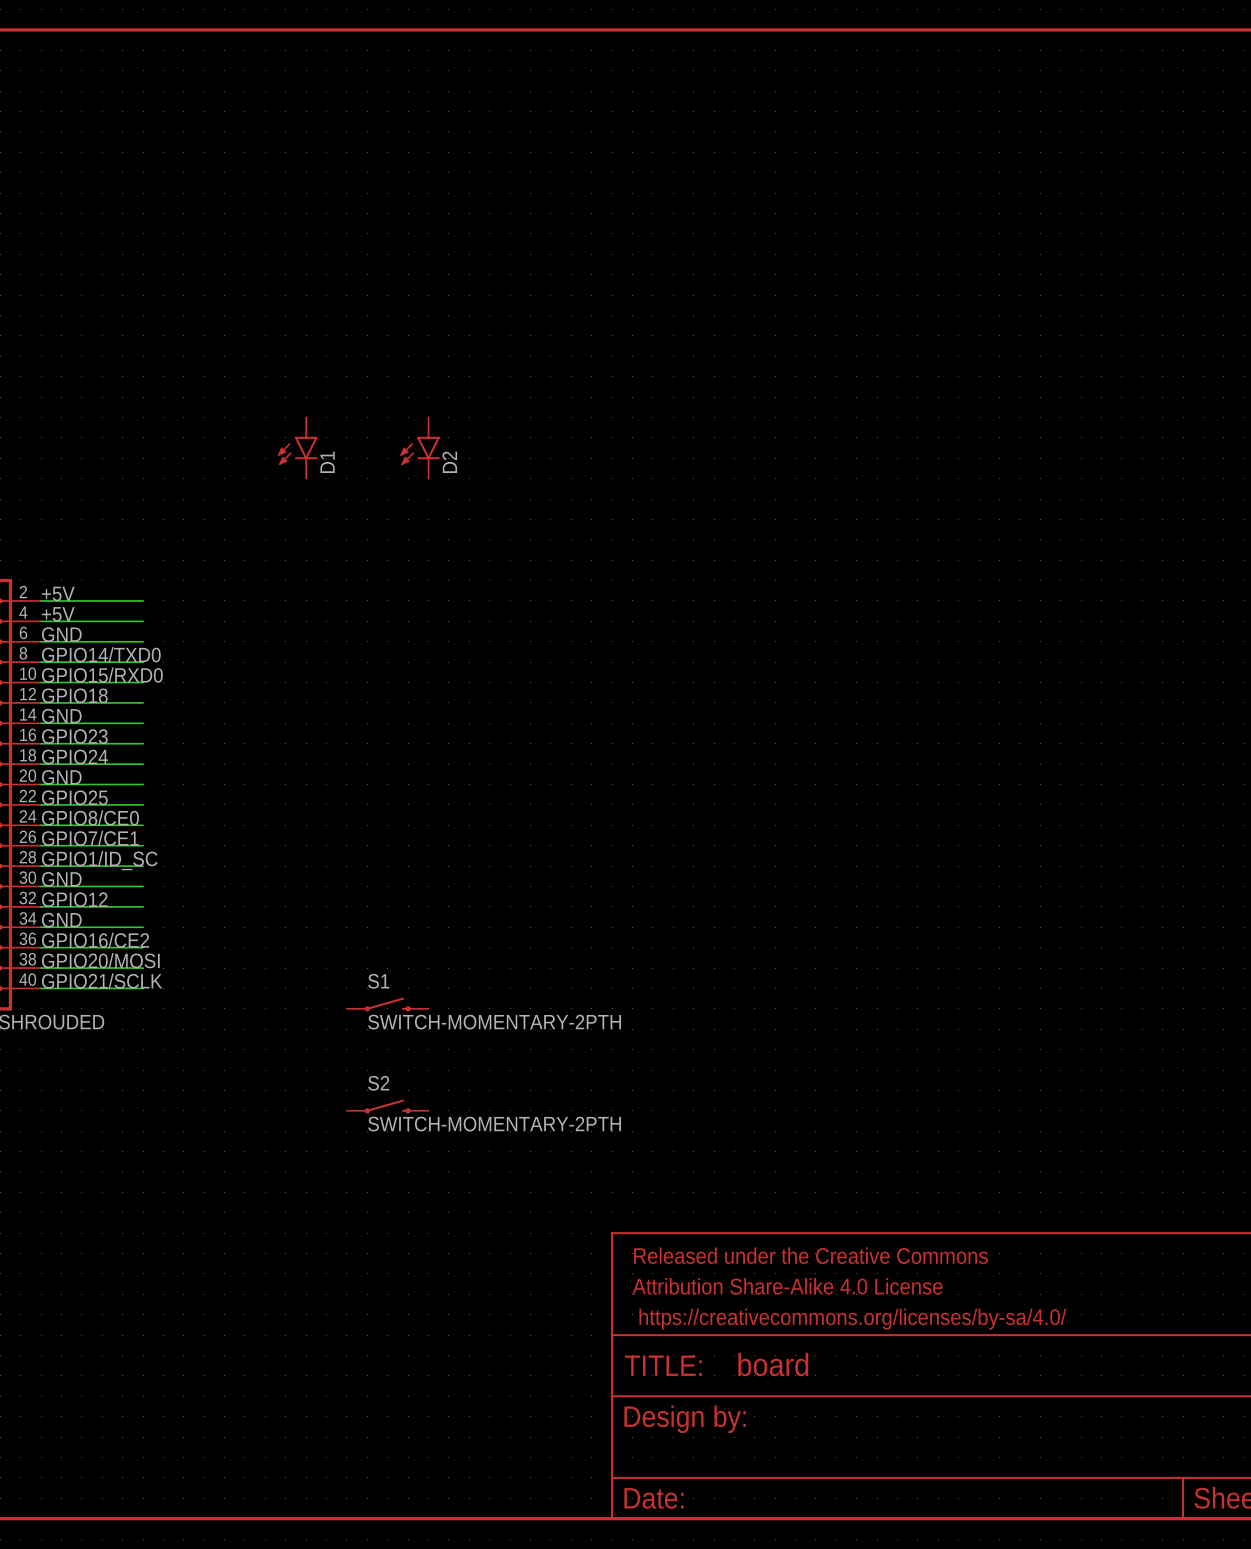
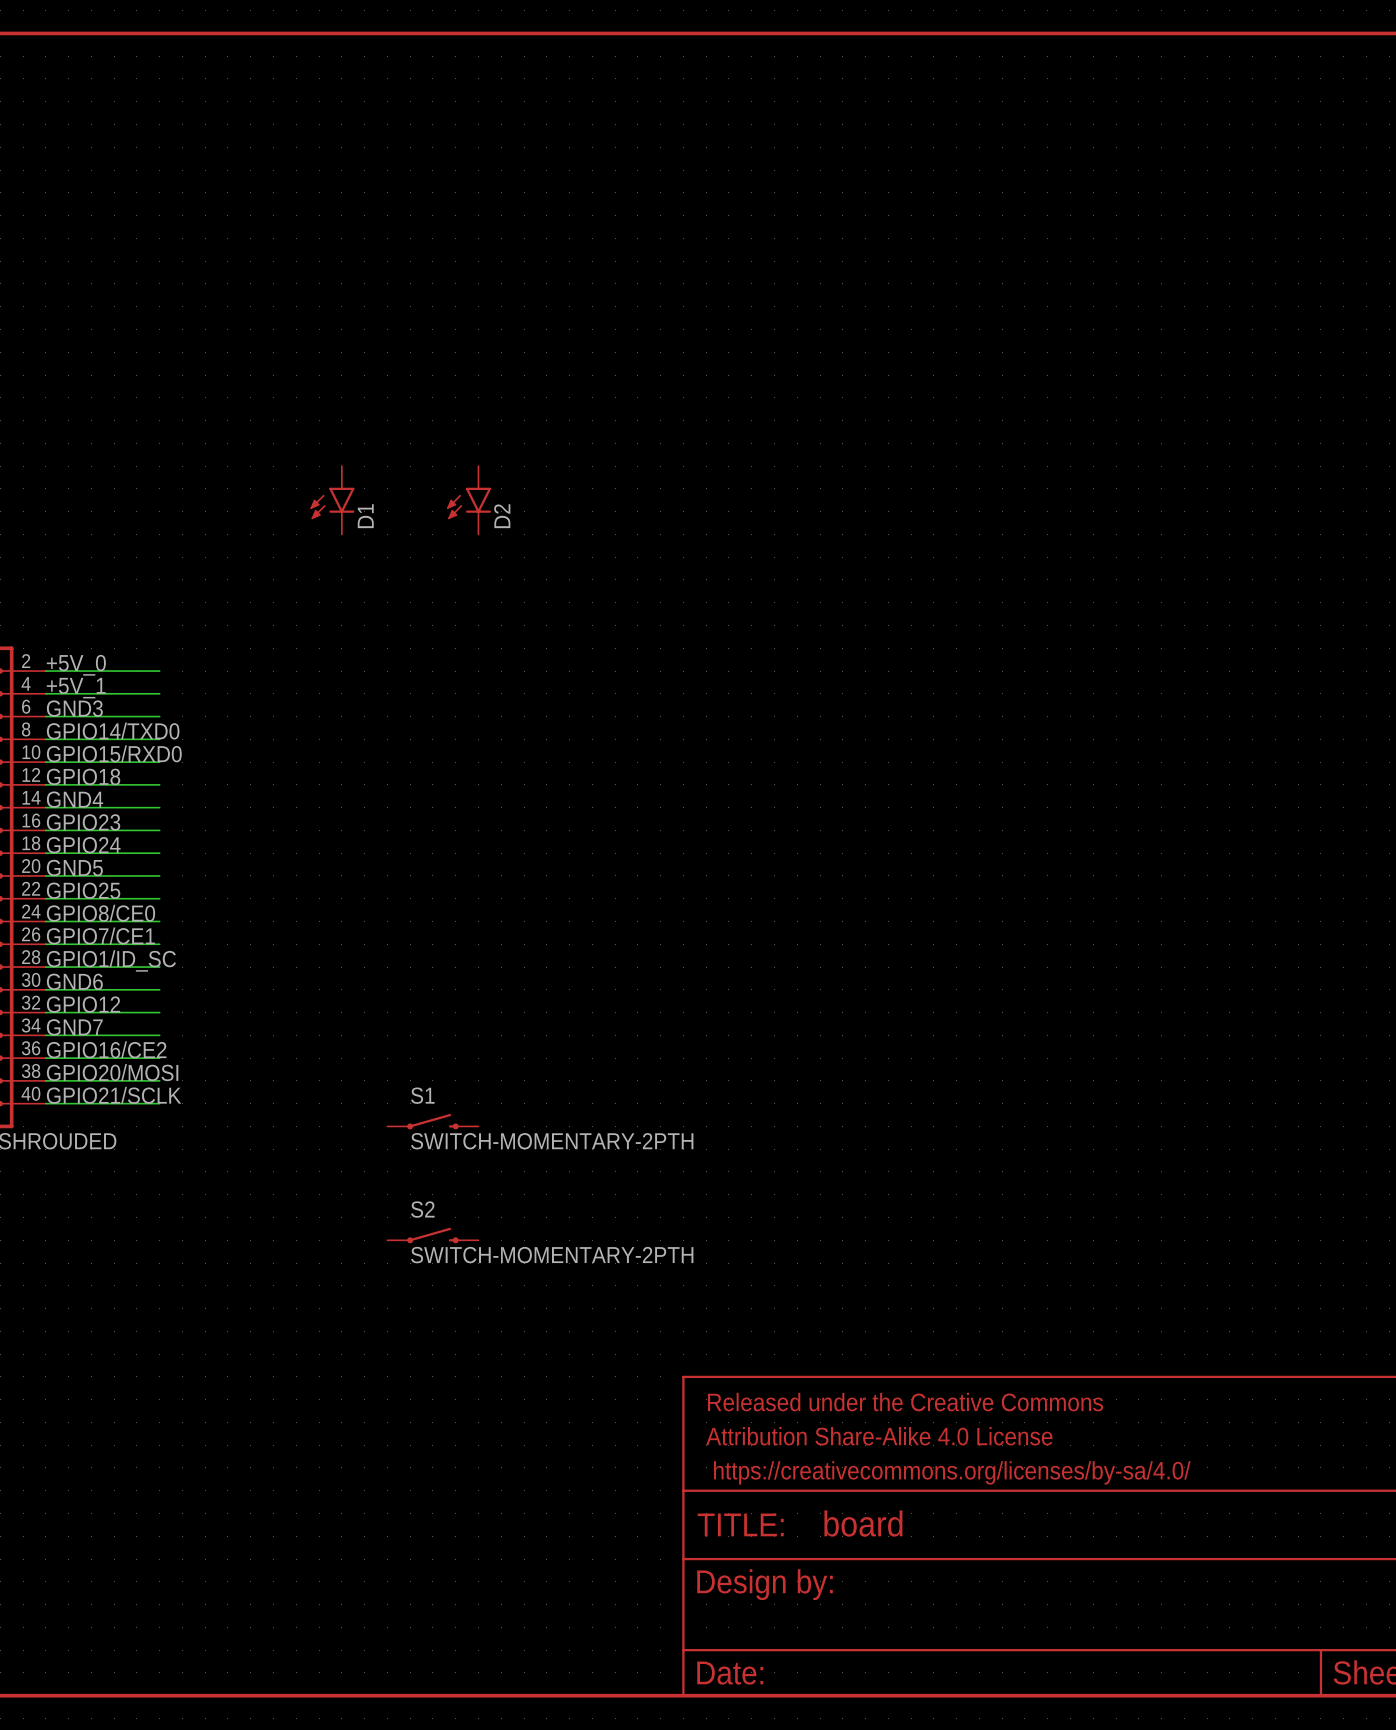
label: +5V (58, 593) -> +5V_0 (76, 665)
label: +5V (58, 614) -> +5V_1 (76, 688)
label: GND (61, 634) -> GND3 (74, 708)
label: GND (61, 716) -> GND4 (75, 799)
label: GND (61, 777) -> GND5 (74, 867)
label: GND (61, 879) -> GND6 (74, 981)
label: GND (61, 920) -> GND7 (74, 1027)

